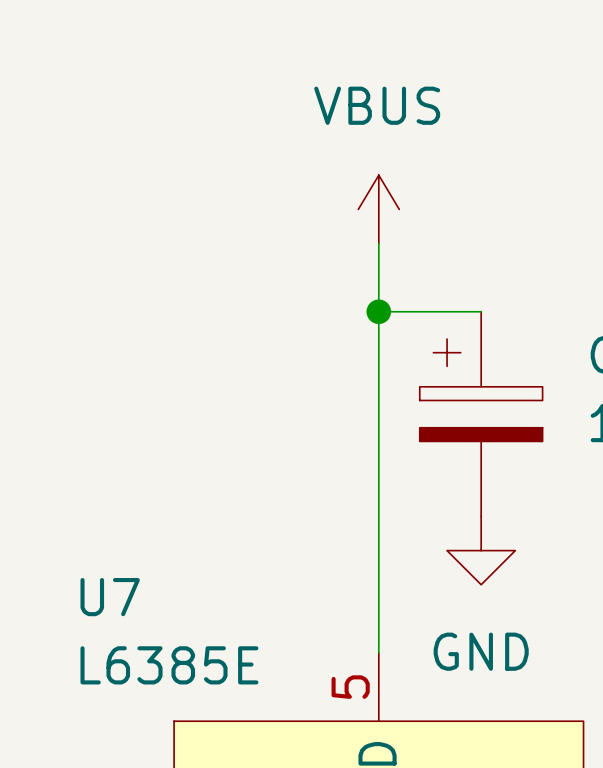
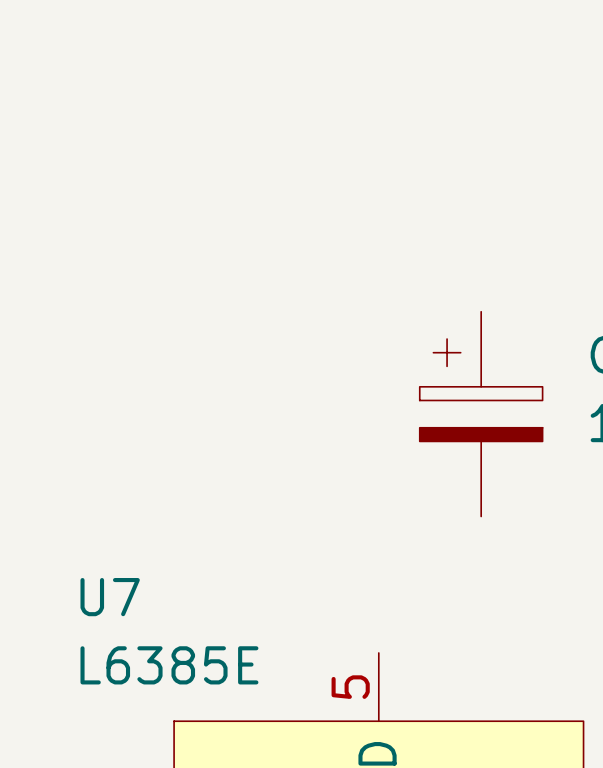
power symbol: VBUS (378, 209) -> none
wire: (378, 243) (378, 652) -> none
wire: (378, 311) (481, 311) -> none
junction: (378, 311) -> none
power symbol: GND (481, 550) -> none

